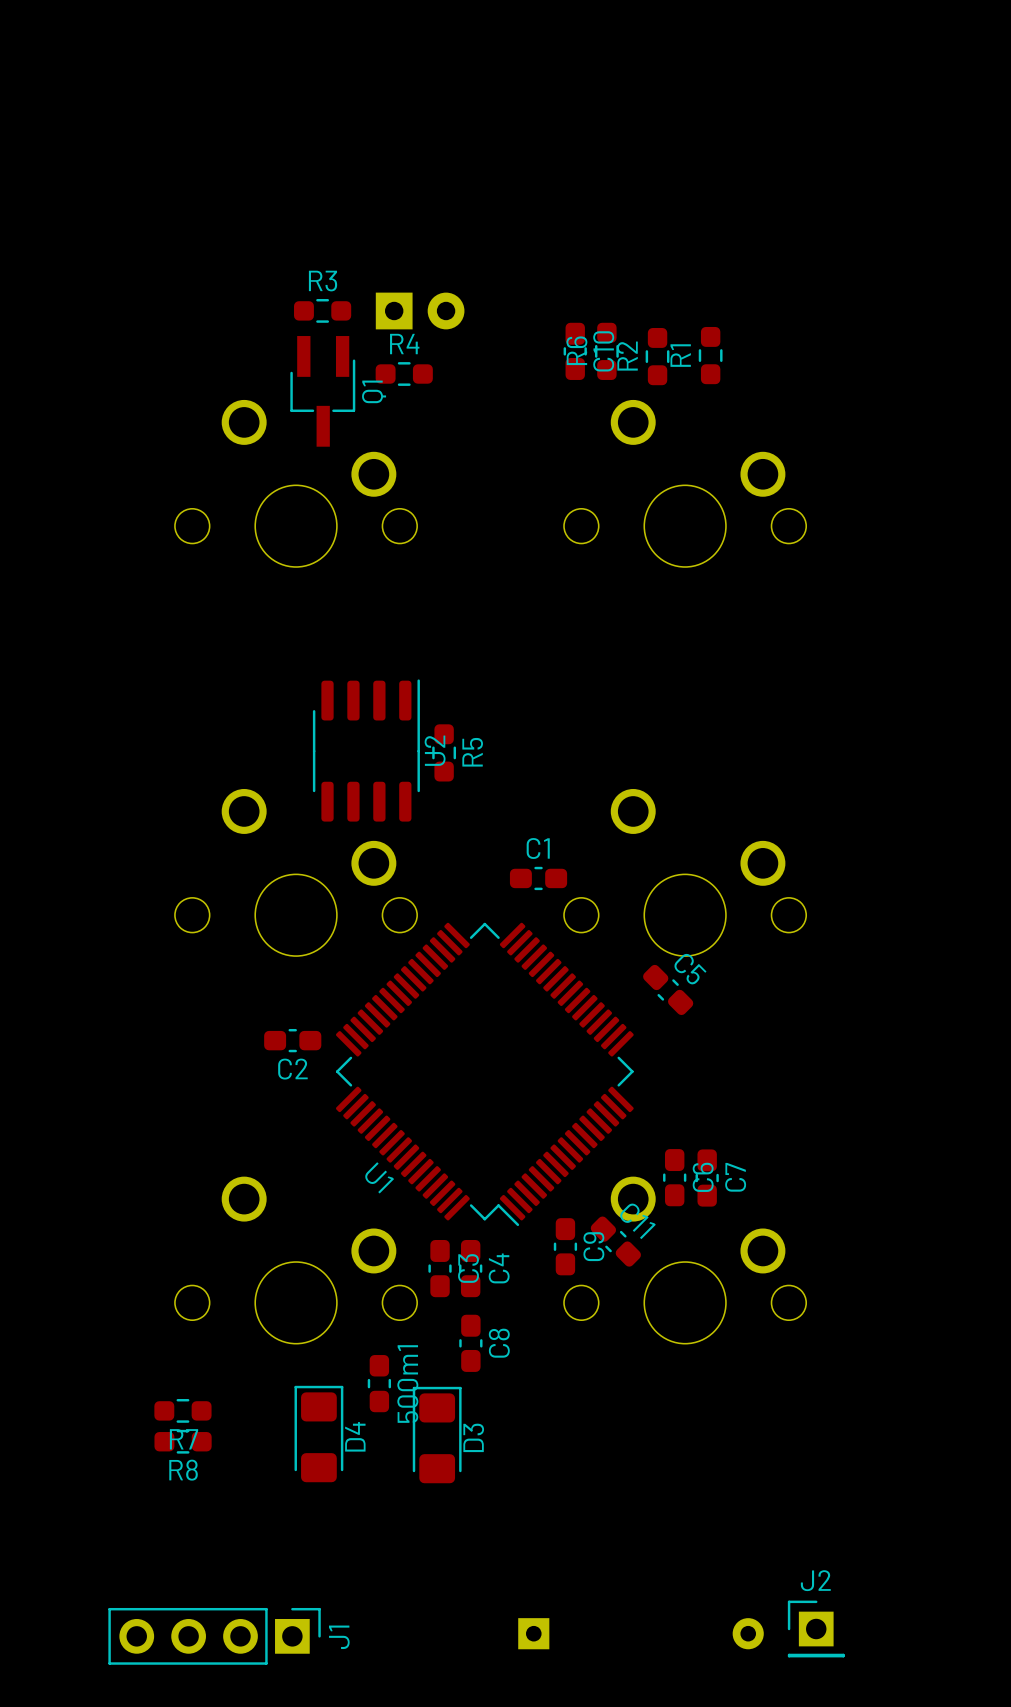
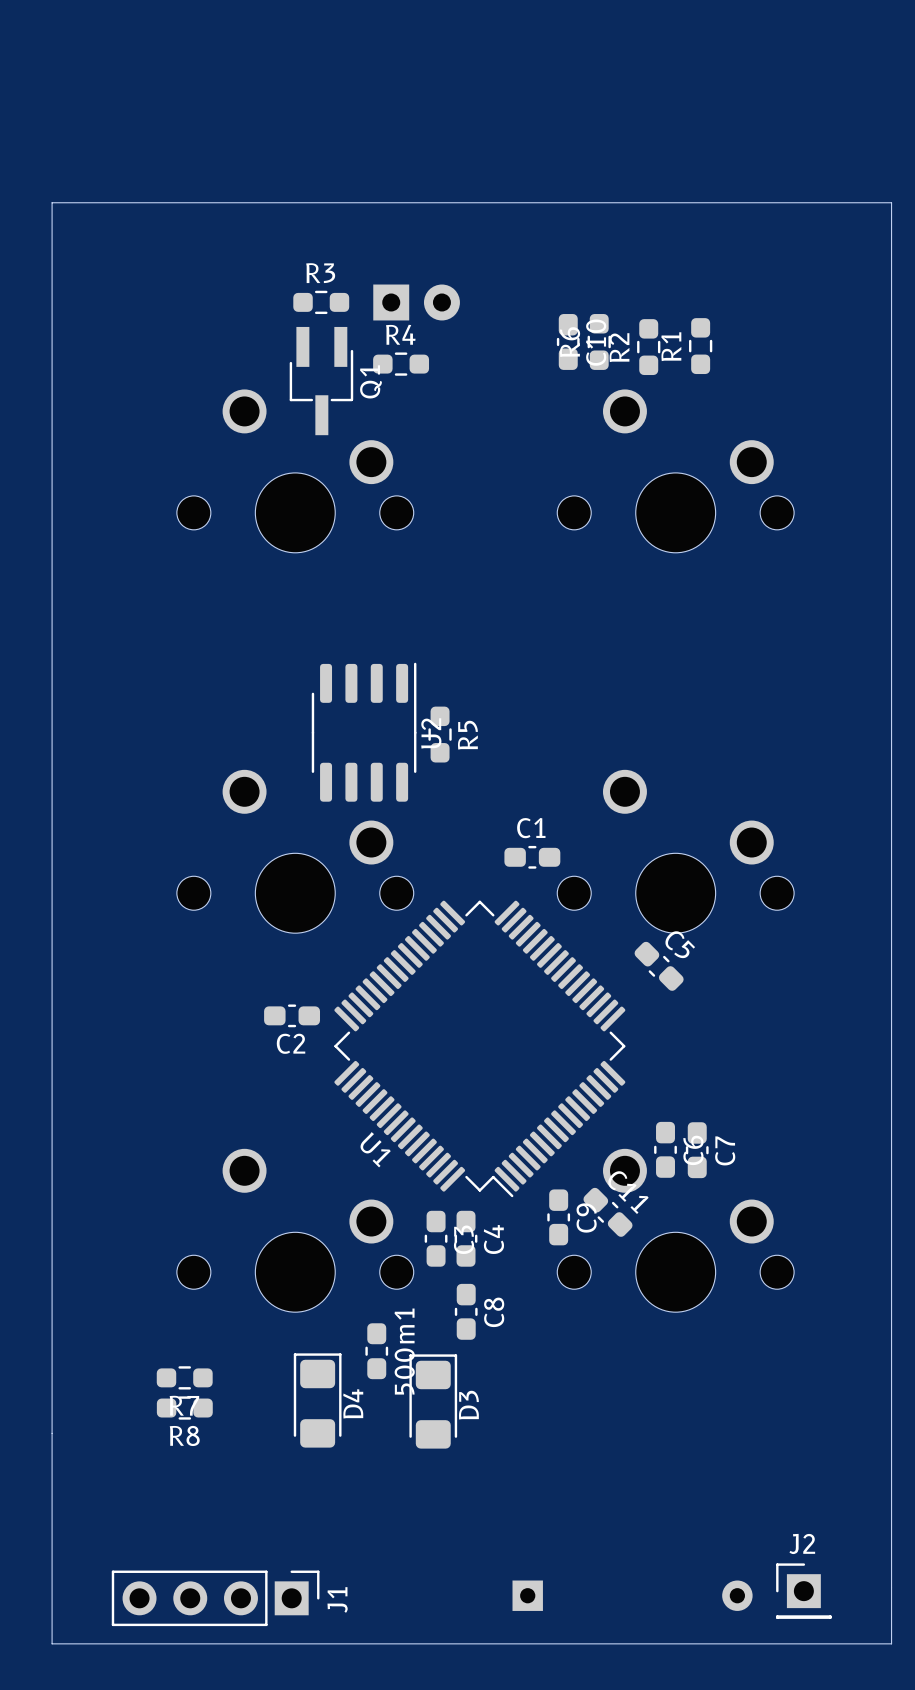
board edge: none -> (52, 202) (891, 202) (891, 1643) (52, 1643) (52, 202)

